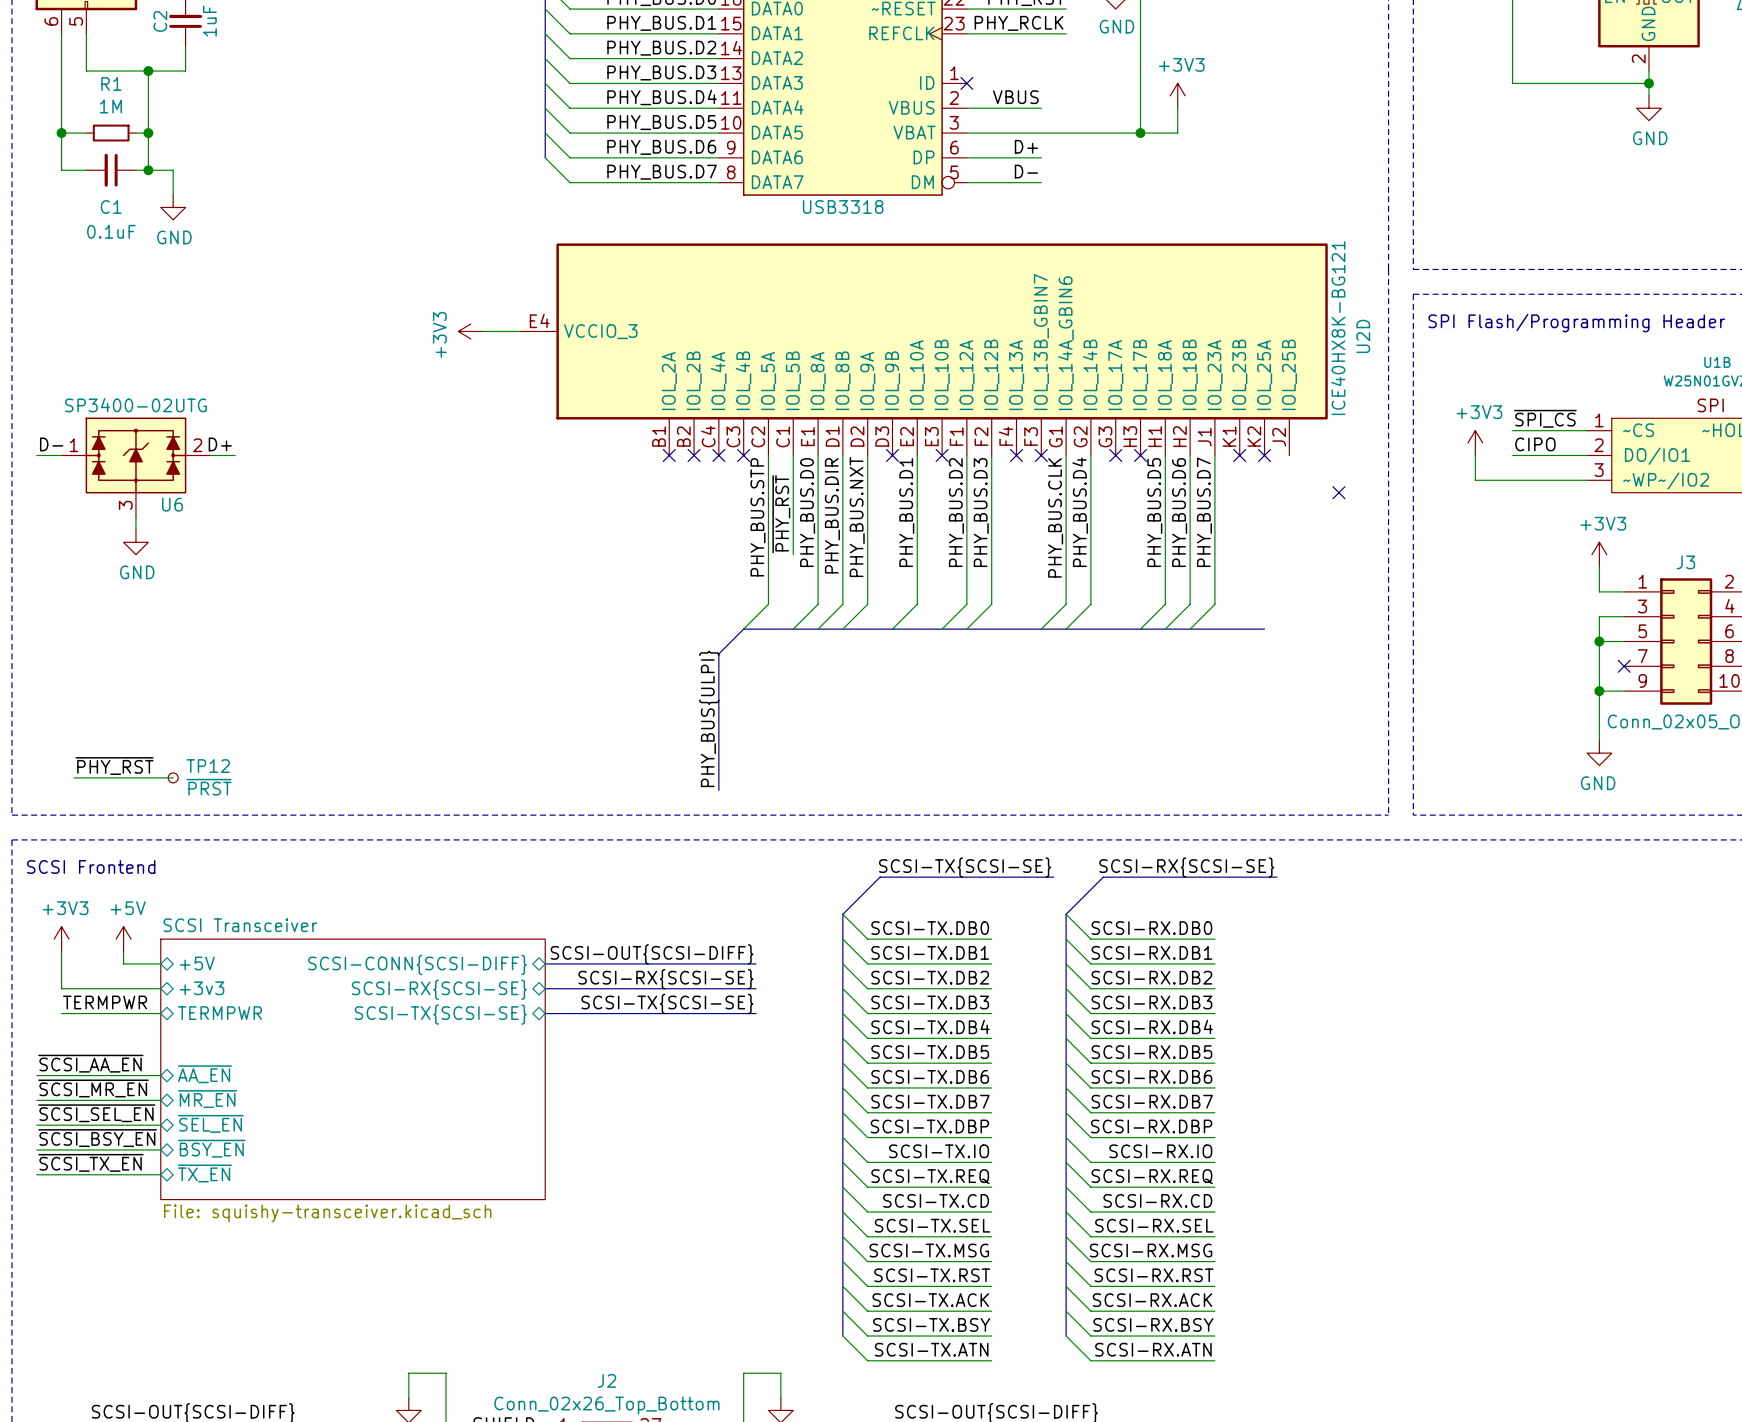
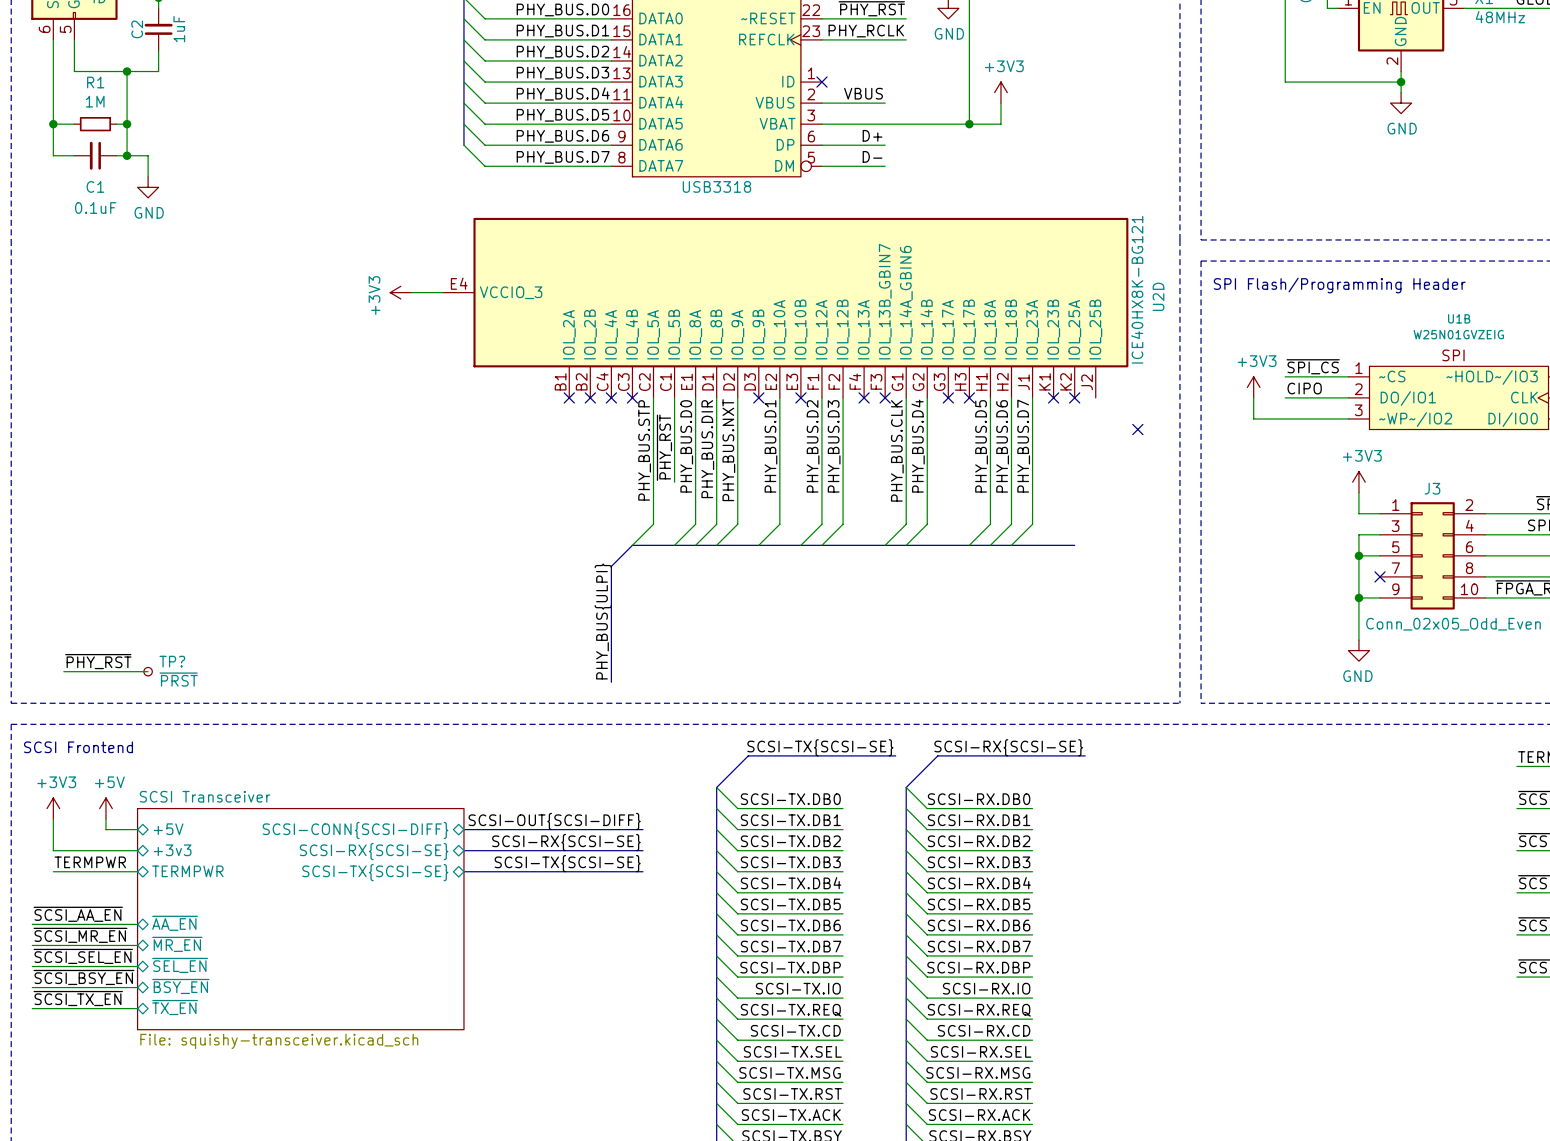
label: D- (51, 444) -> none
label: D+ (220, 444) -> none
wire: (36, 455) (61, 455) -> none
wire: (210, 455) (235, 455) -> none
U6: SP3400-02UTG (135, 467) -> none
wire: (135, 517) (135, 529) -> none
power symbol: GND (135, 542) -> none
TP12 name: TP12 (208, 766) -> TP? (172, 661)

